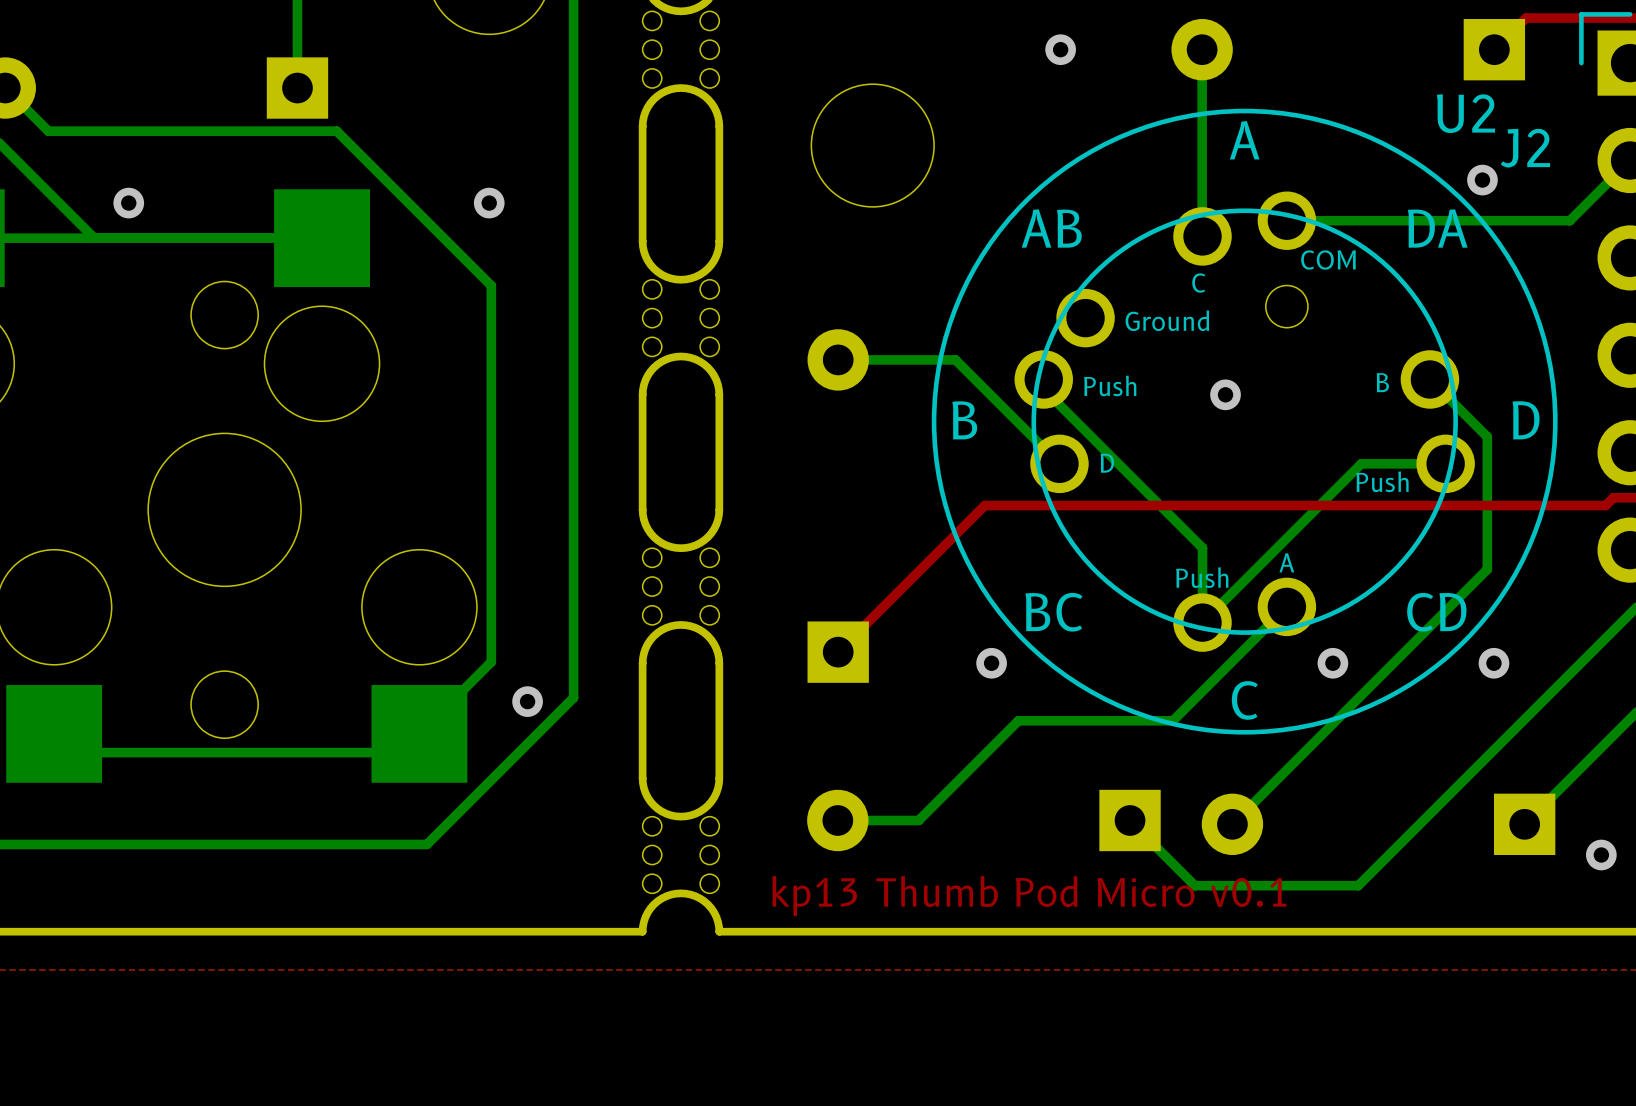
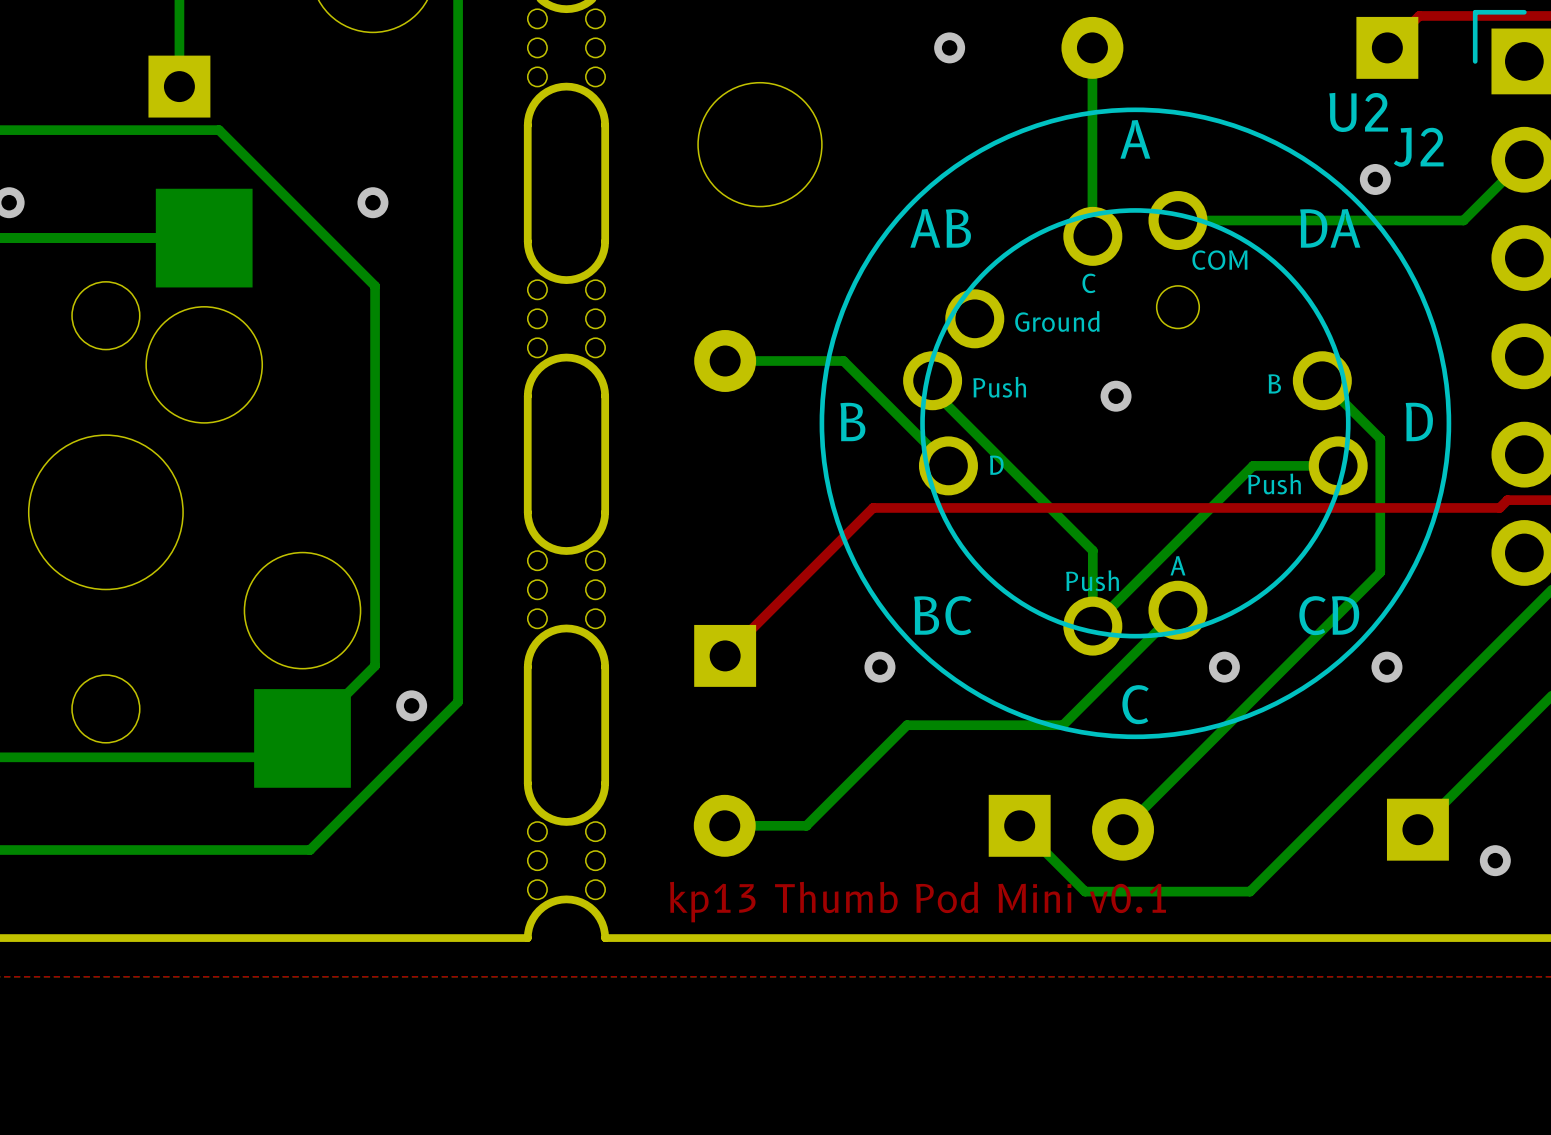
text: kp13 Thumb Pod Micro v0.1 (1029, 896) -> kp13 Thumb Pod Mini v0.1 (917, 902)

